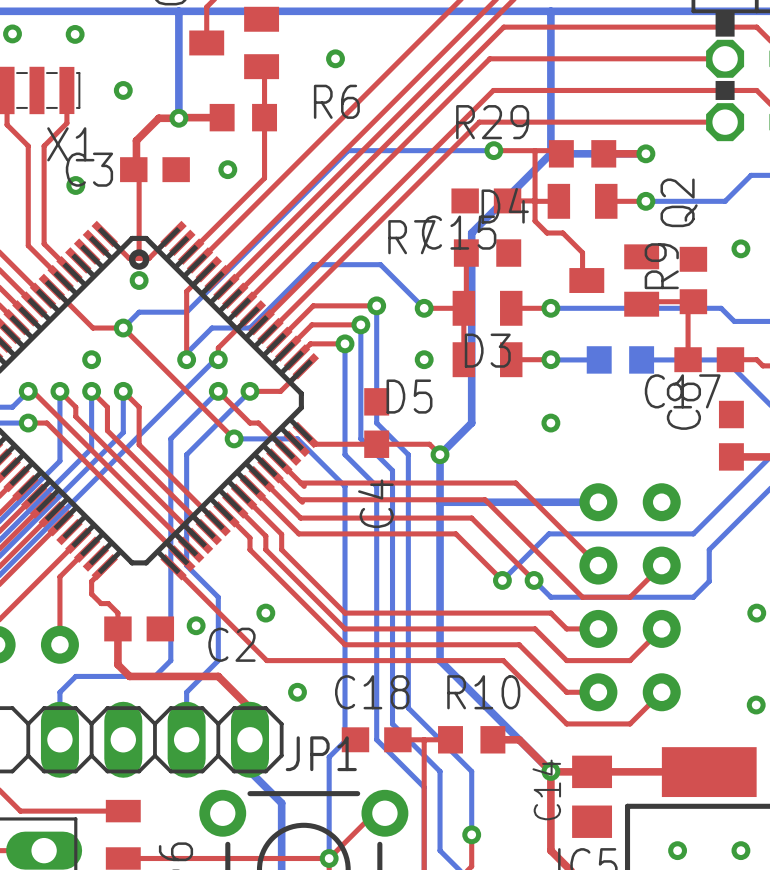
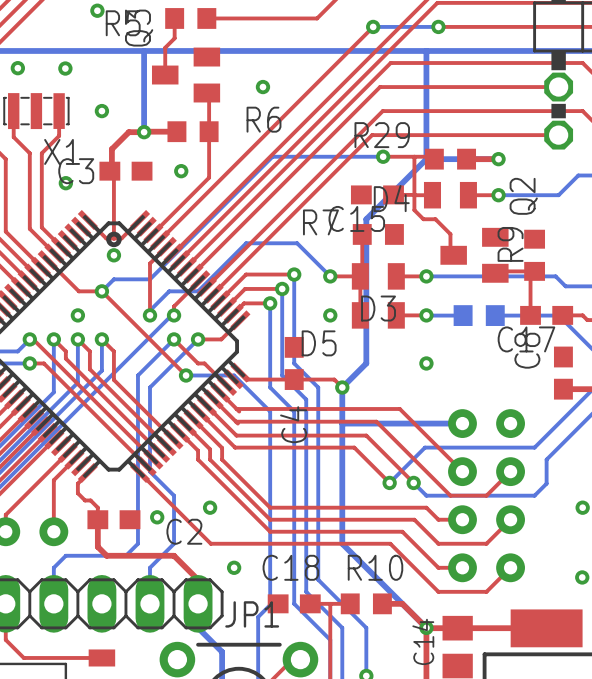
via: (740, 248) -> none

